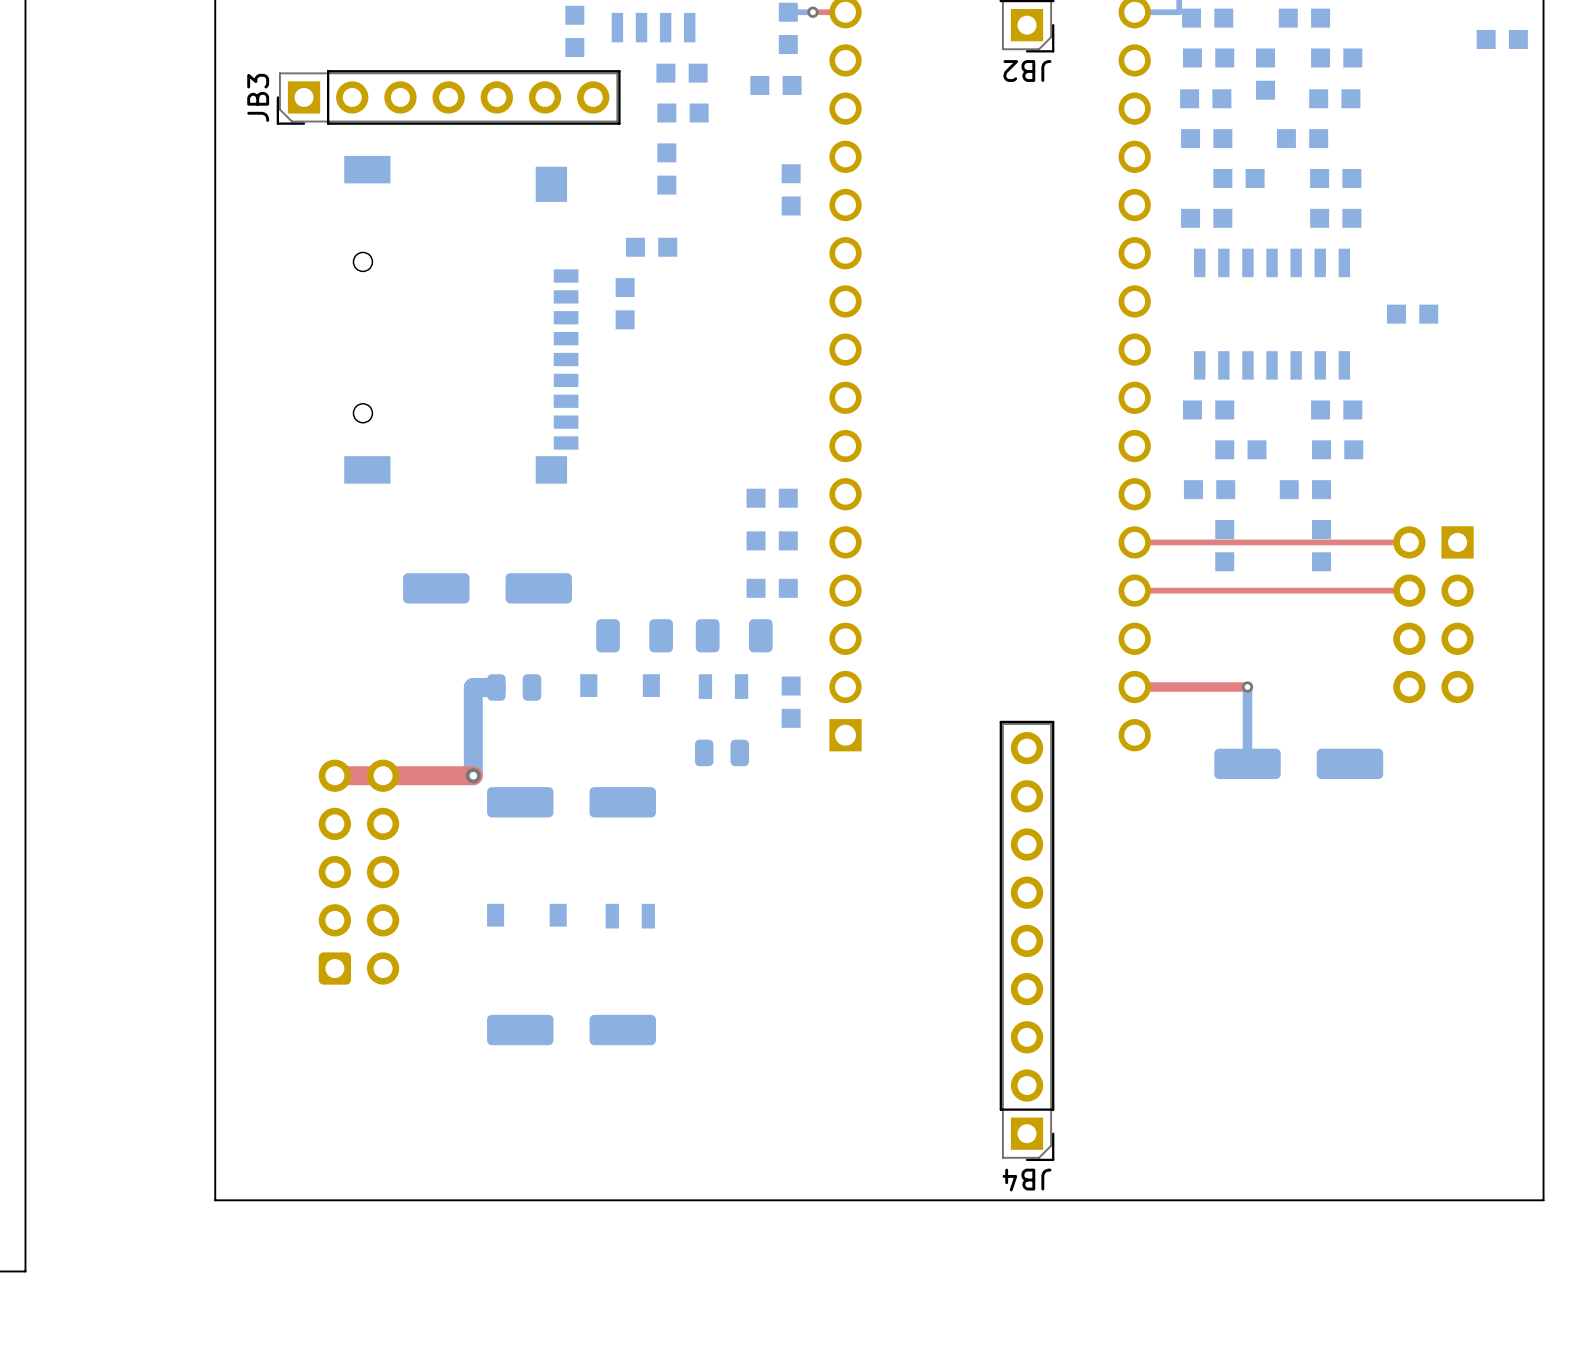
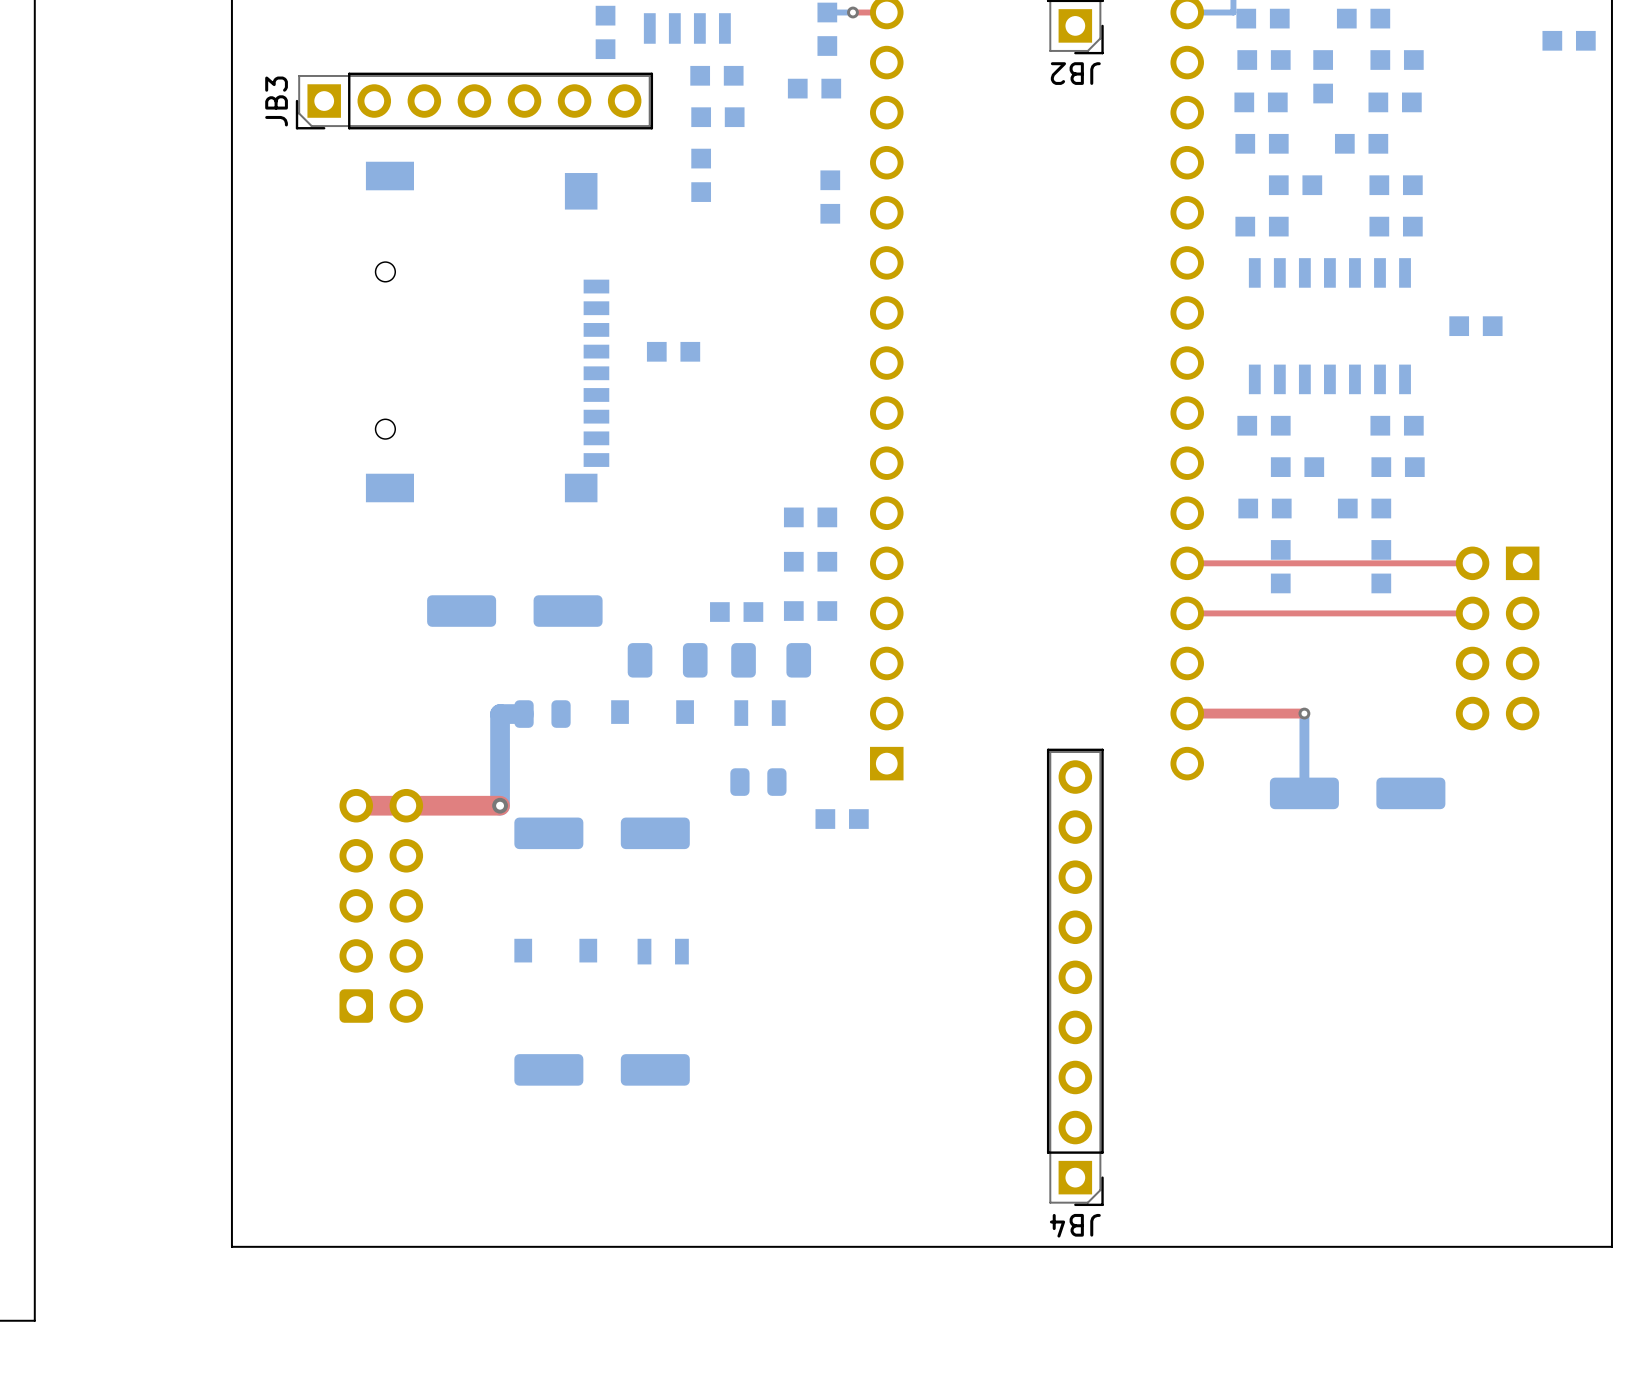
part: (651, 247) -> none
part rotation: 0° (625, 303) -> 90° clockwise (673, 351)
part position: (625, 303) -> (673, 351)
part: none -> (736, 612)
part: (791, 702) -> none
part: none -> (842, 819)

